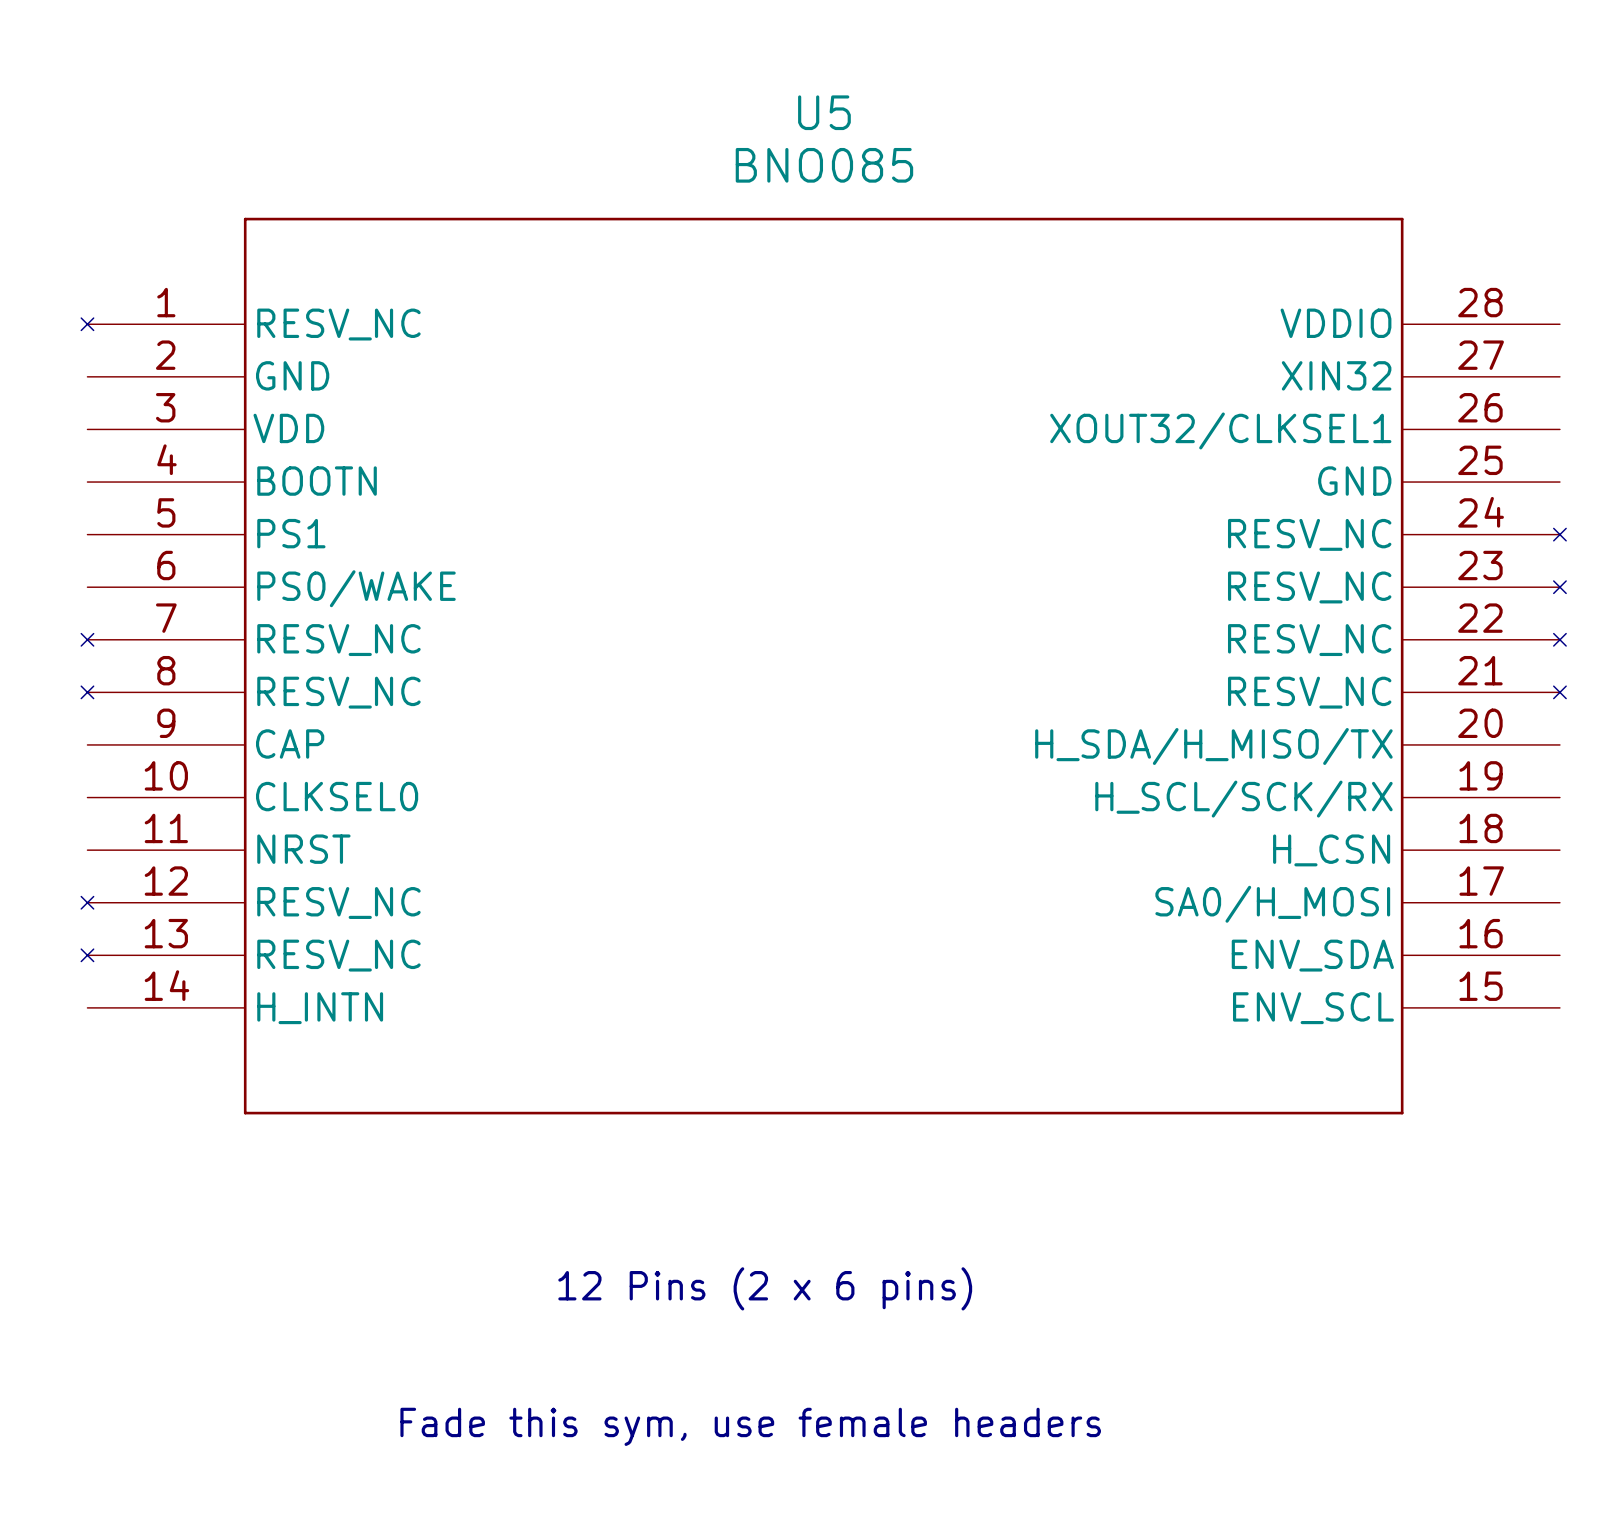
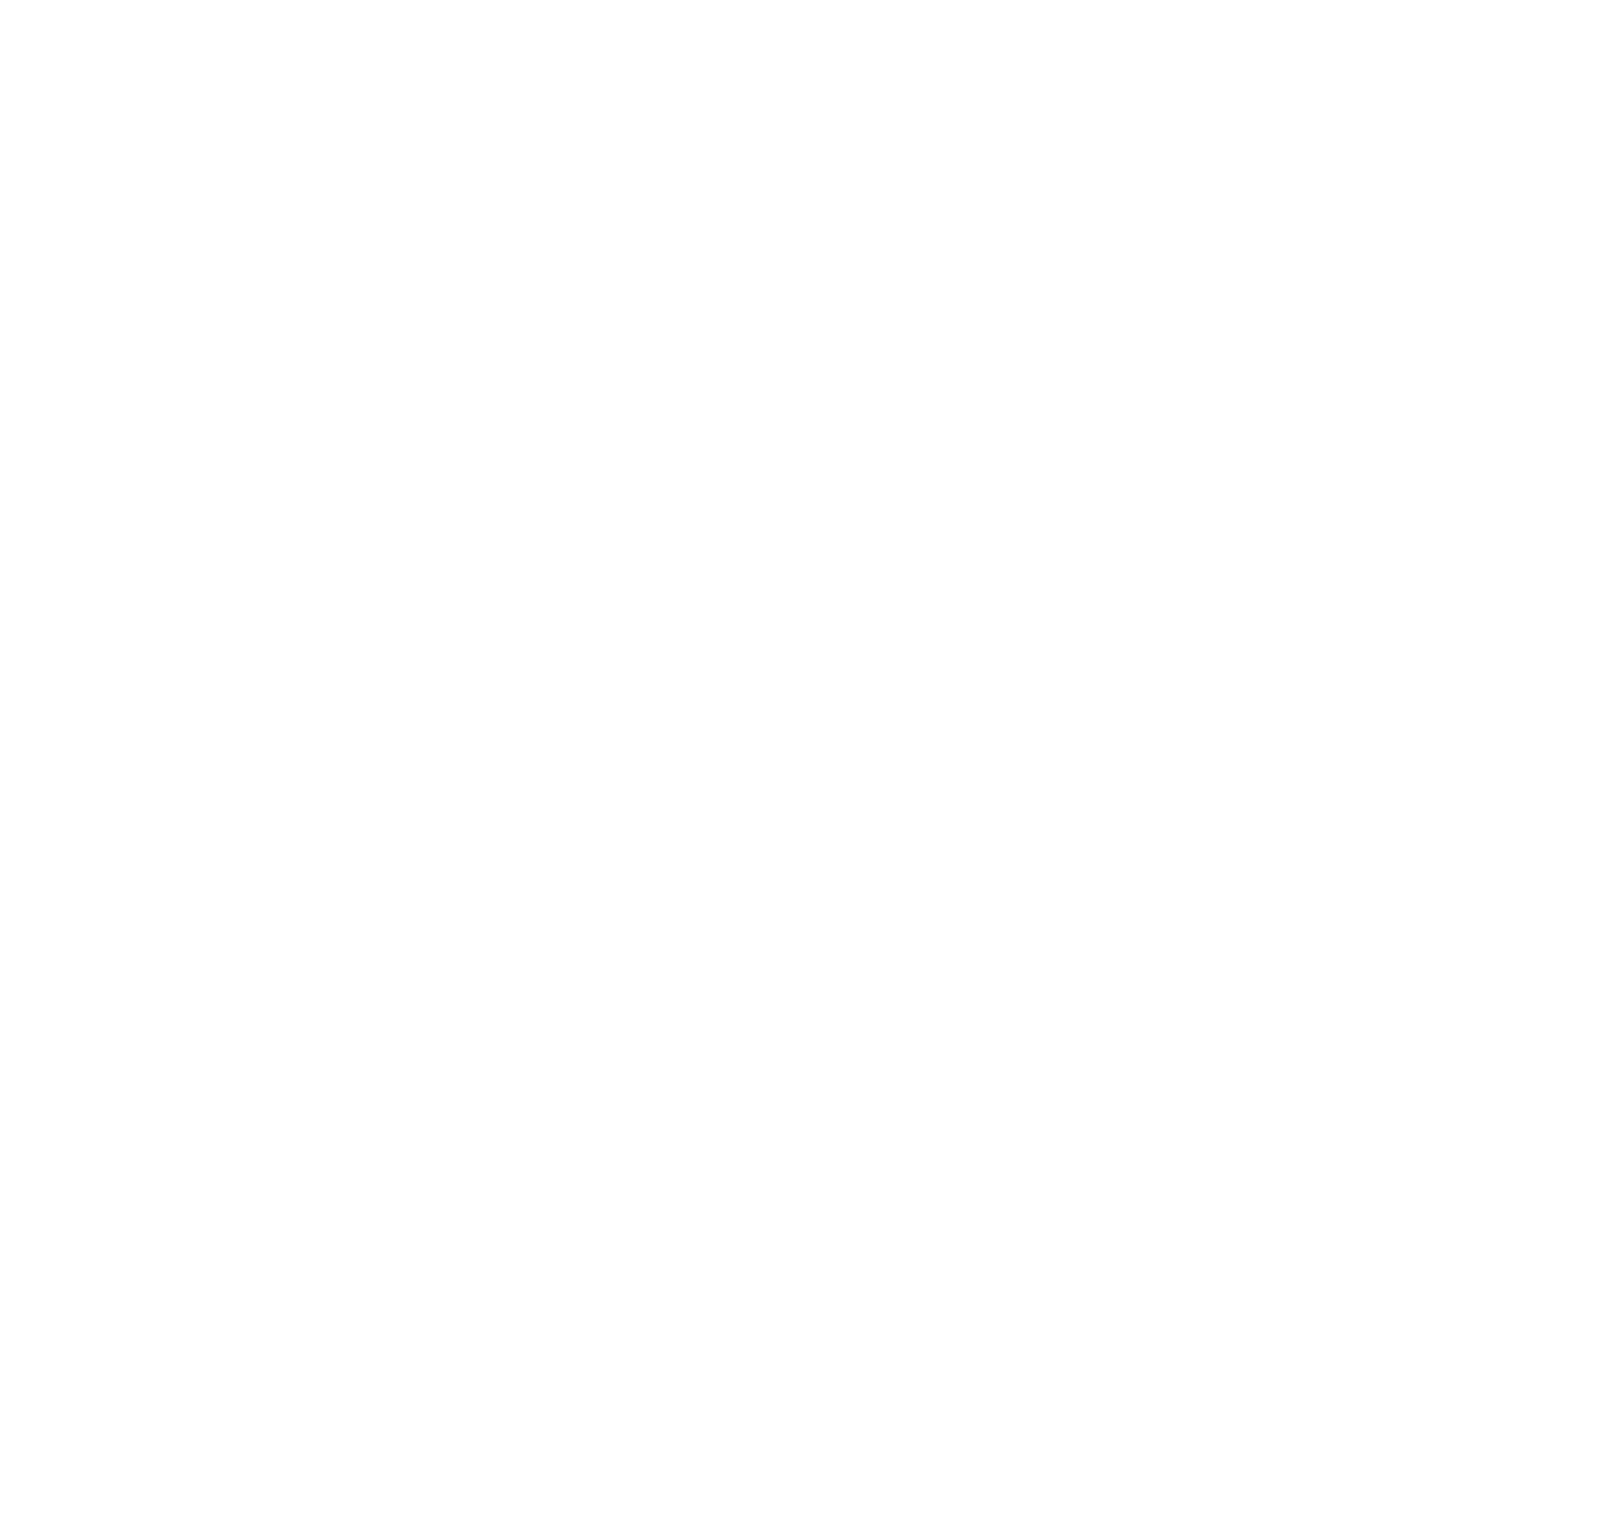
U5: BNO085 (823, 666) -> none
text: 12 Pins (2 x 6 pins) (765, 1288) -> none
text: Fade this sym, use female headers (750, 1426) -> none

